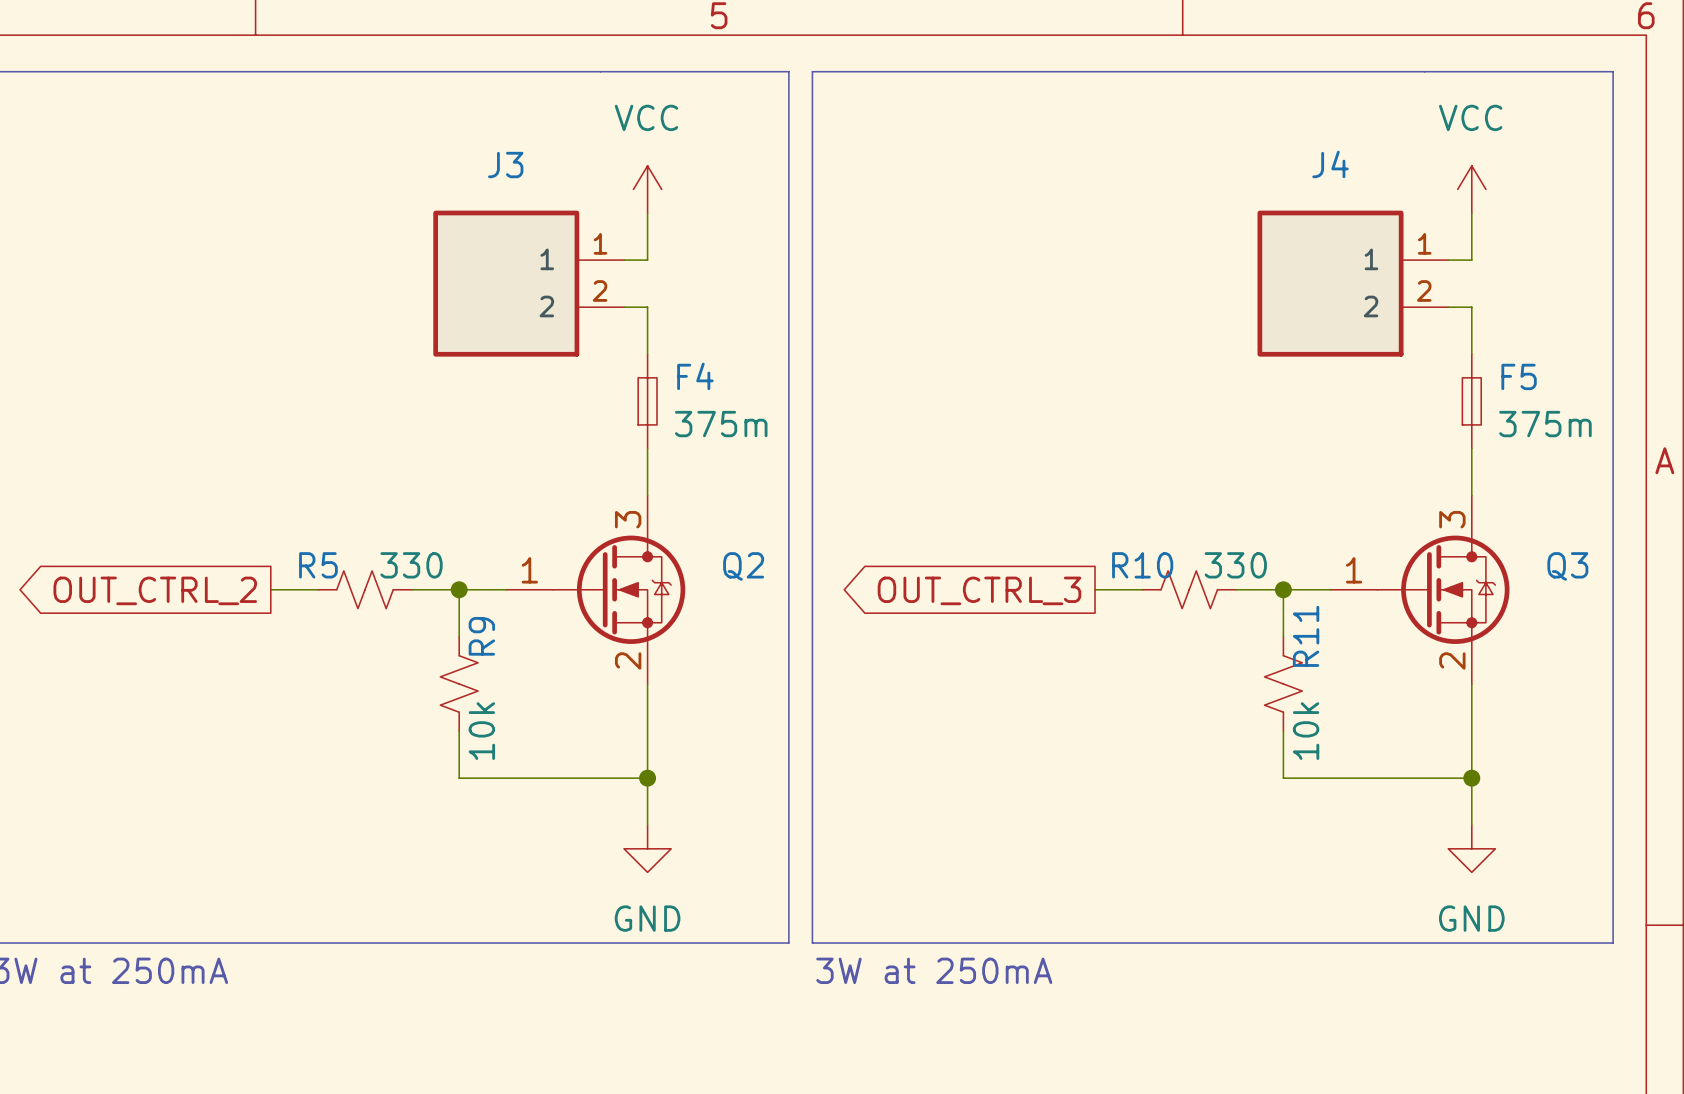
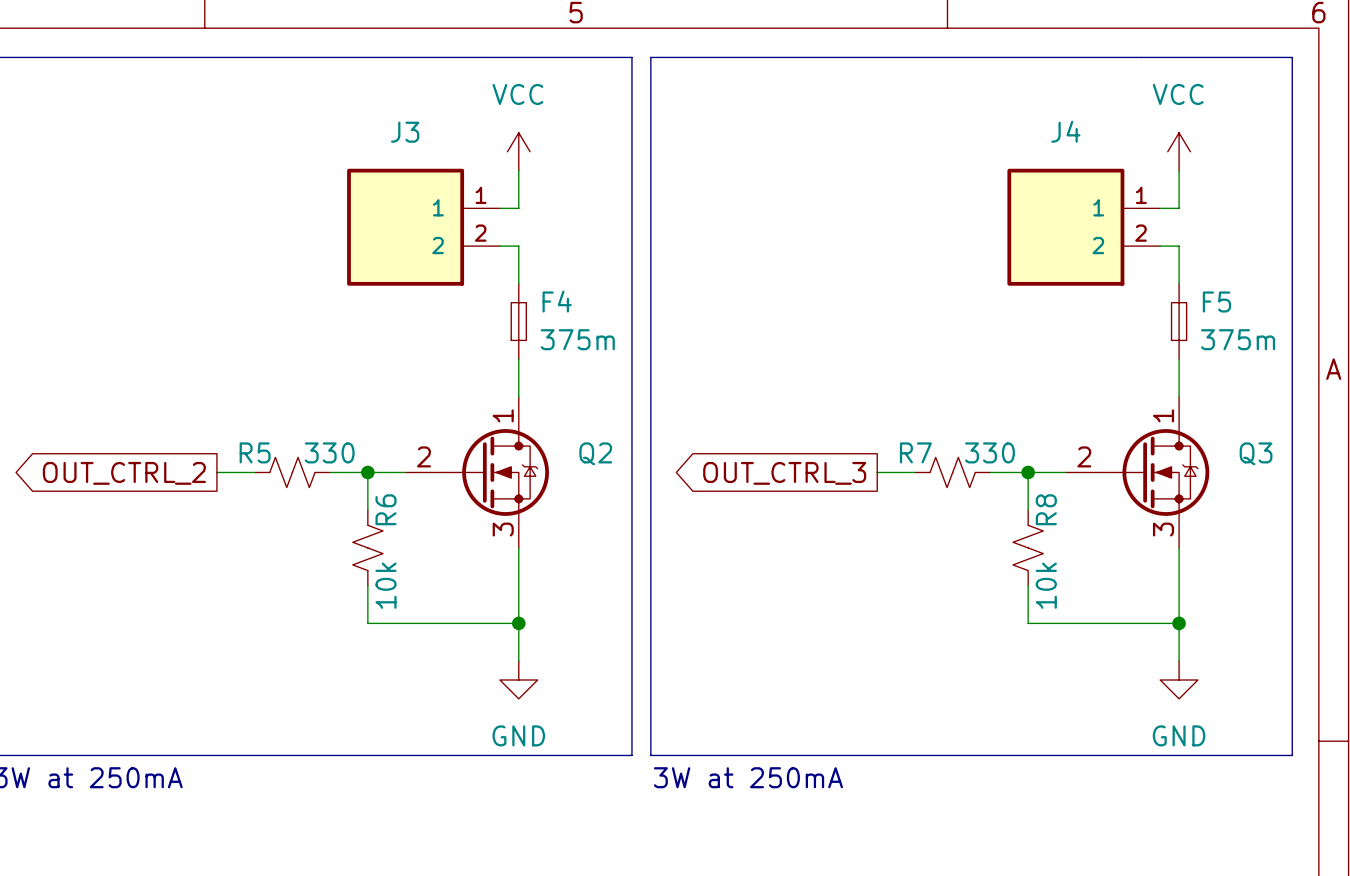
Q2 pin number: 3 (628, 519) -> 1 (503, 415)
Q3 pin number: 3 (1452, 519) -> 1 (1163, 415)
R10 name: R10 (1142, 565) -> R7 (915, 452)
Q2 pin number: 1 (529, 570) -> 2 (424, 456)
Q3 pin number: 1 (1354, 570) -> 2 (1084, 456)
R9 name: R9 (481, 636) -> R6 (386, 509)
R11 name: R11 (1306, 636) -> R8 (1046, 509)
Q2 pin number: 2 (628, 660) -> 3 (503, 529)
Q3 pin number: 2 (1452, 660) -> 3 (1163, 529)

